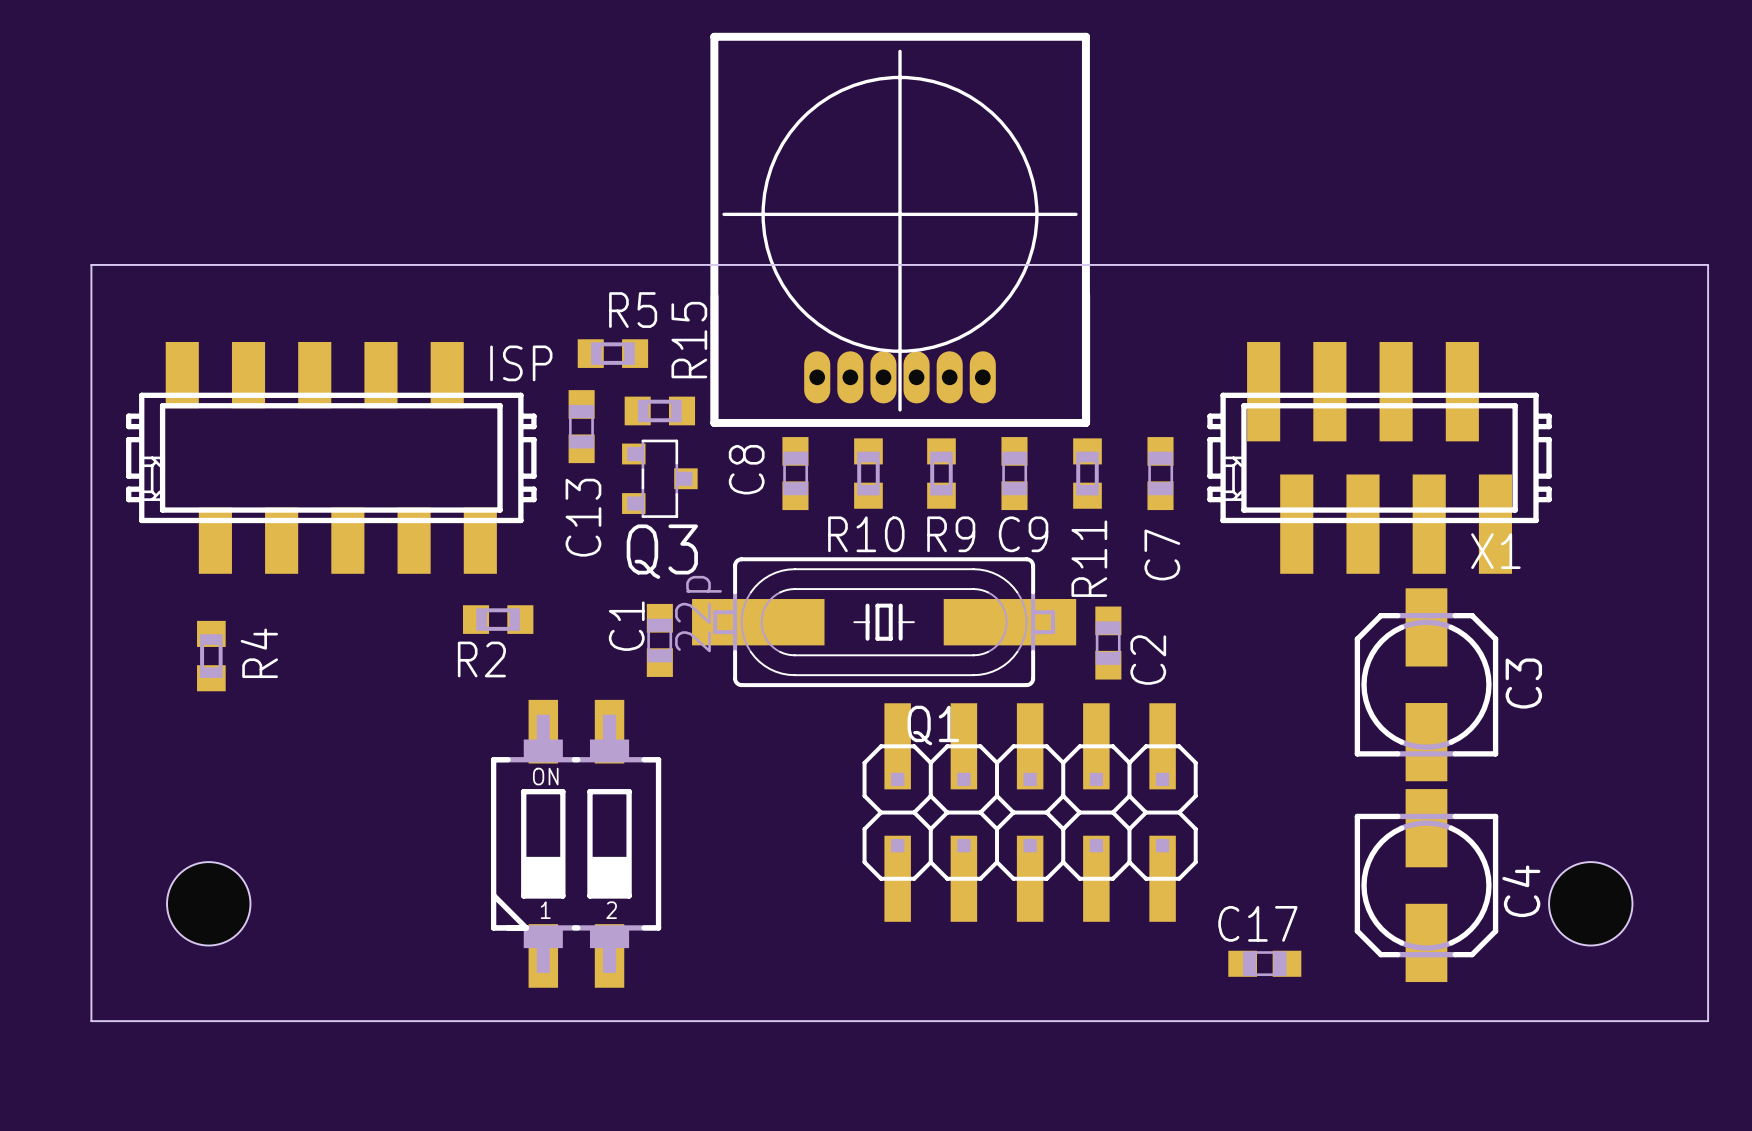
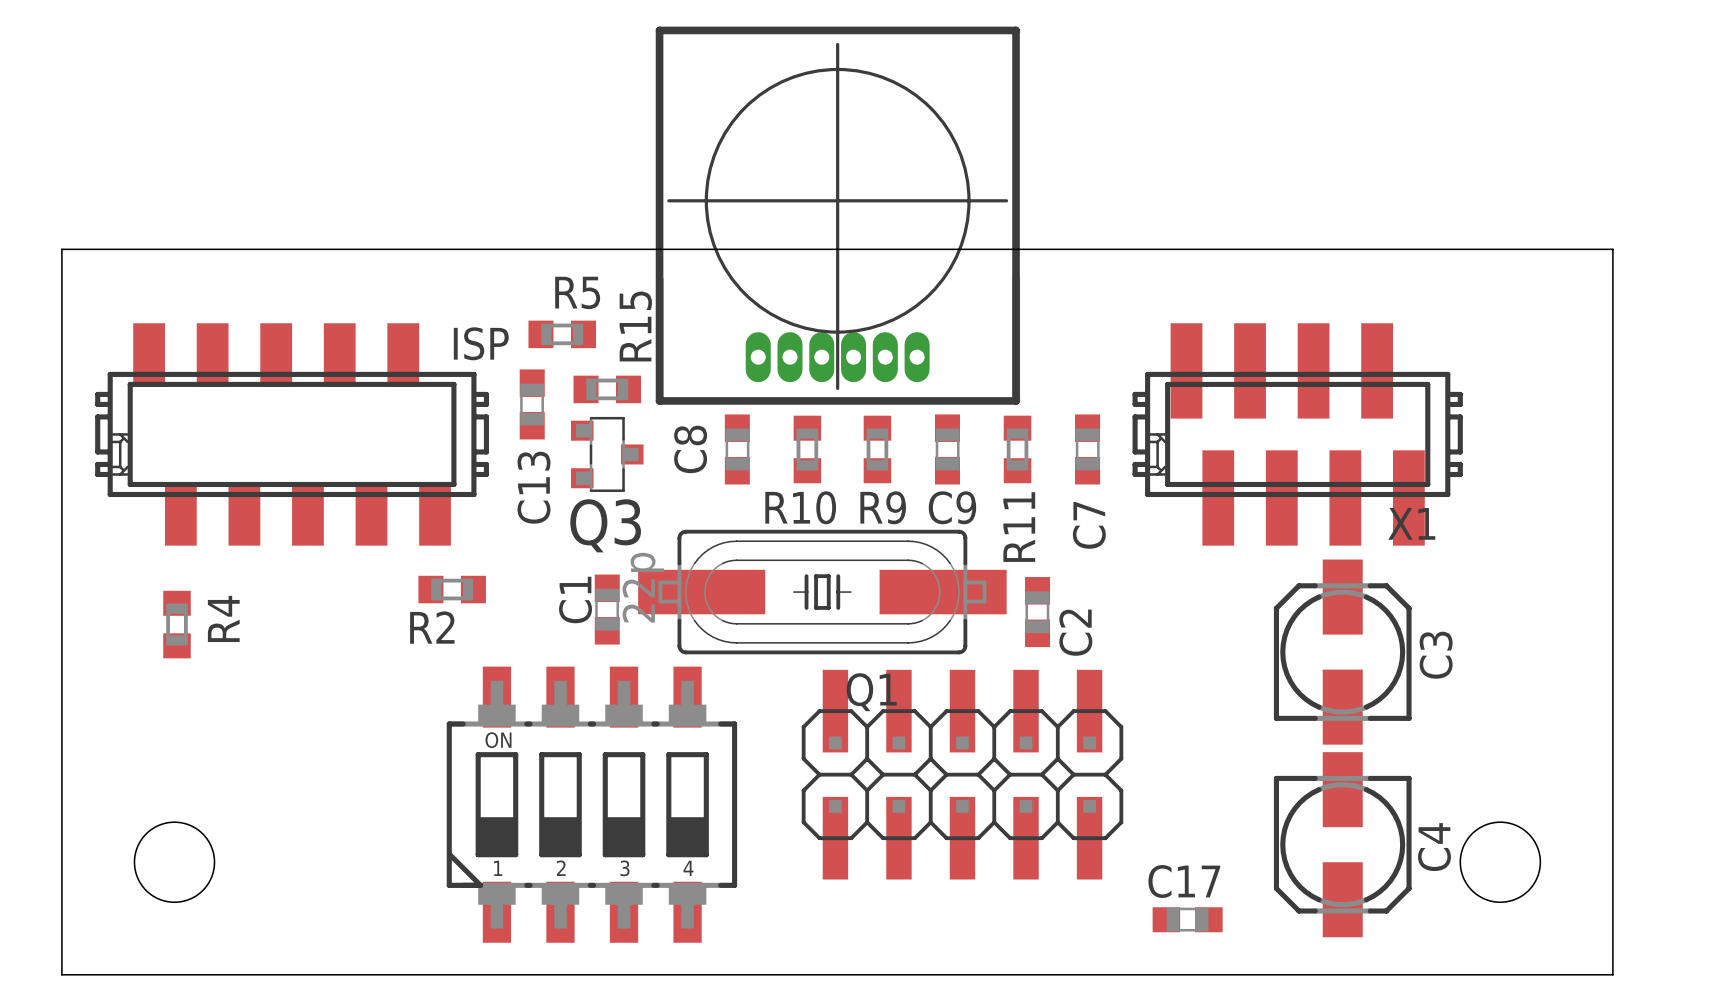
part: (576, 843) -> none
part: none -> (591, 804)

